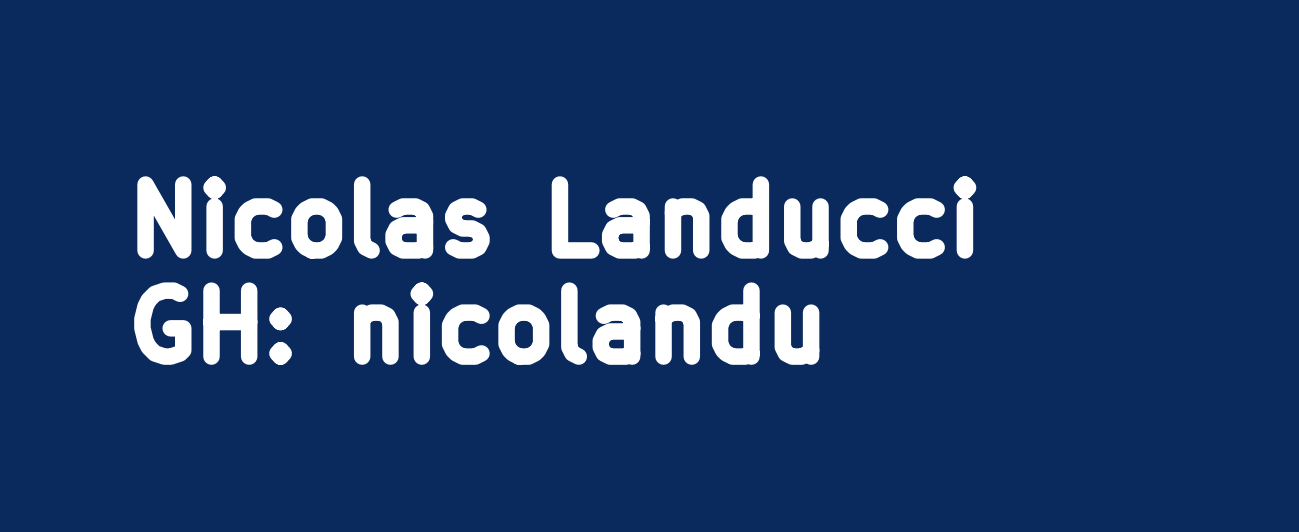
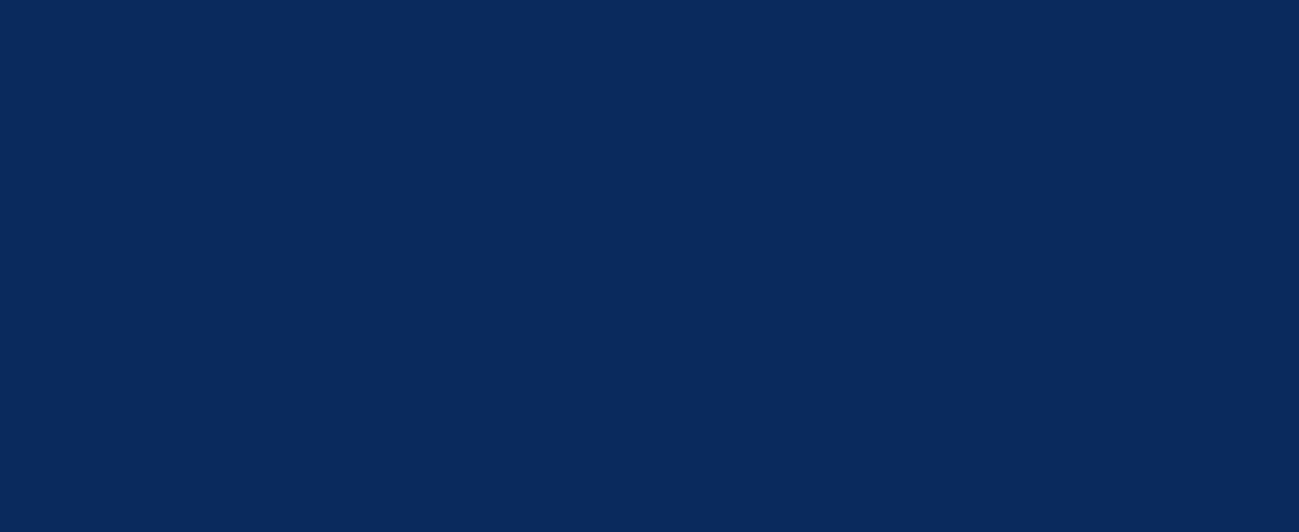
text: Nicolas Landucci (556, 217) -> none
text: GH: nicolandu (476, 323) -> none

